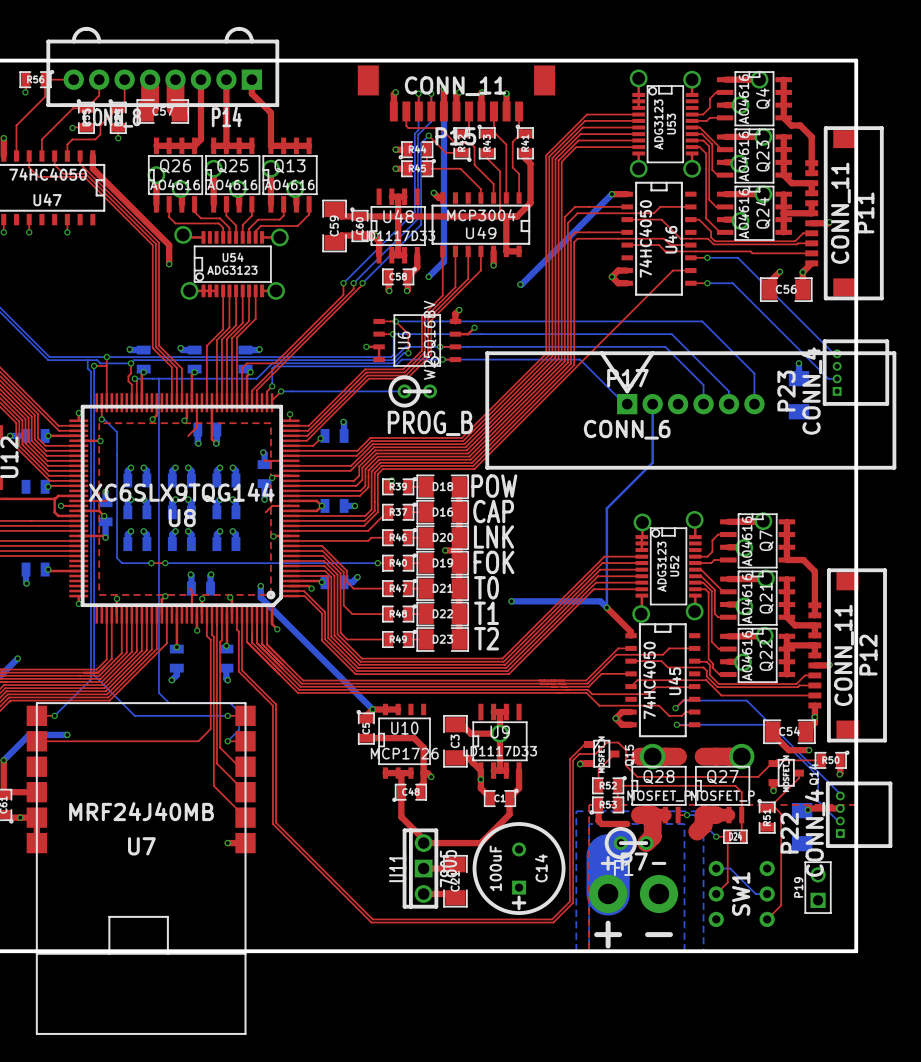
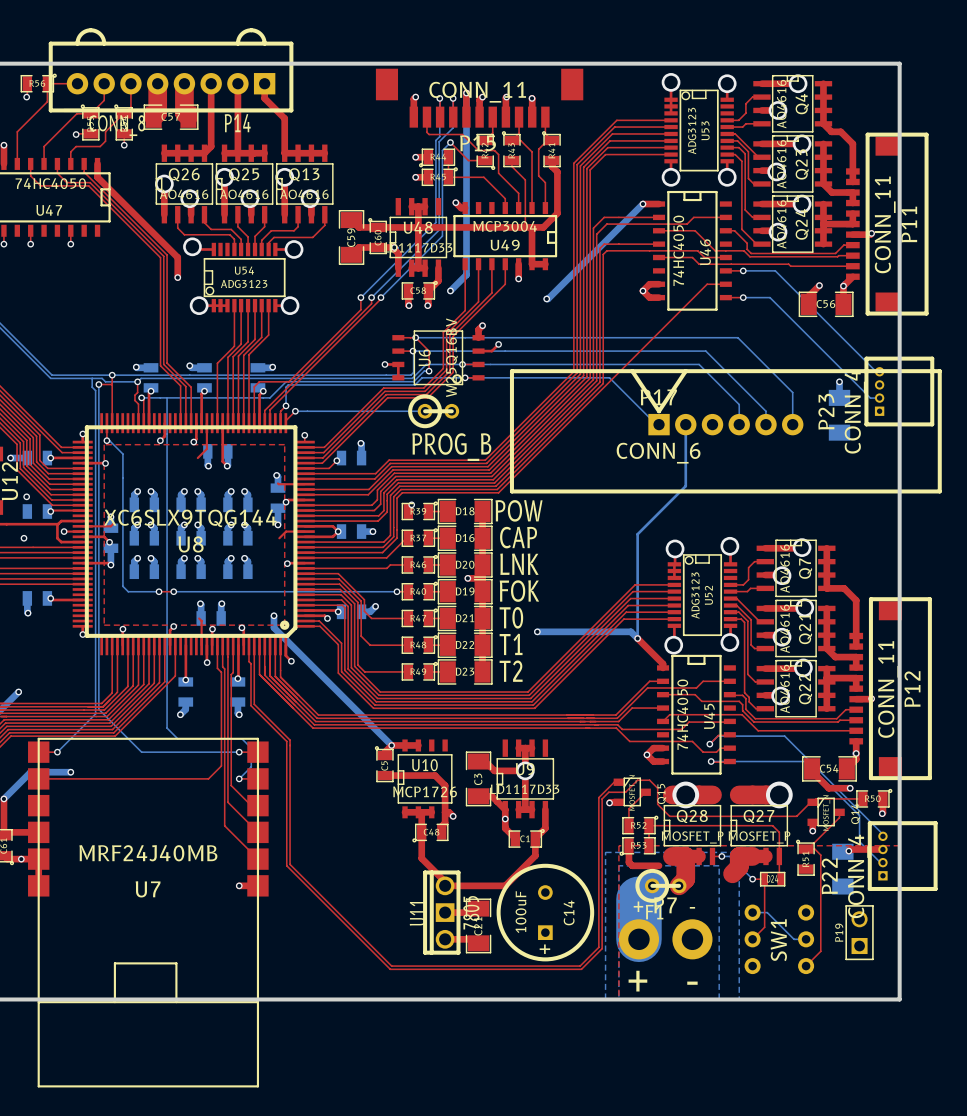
via: none -> (26, 496)
via: none -> (24, 538)

